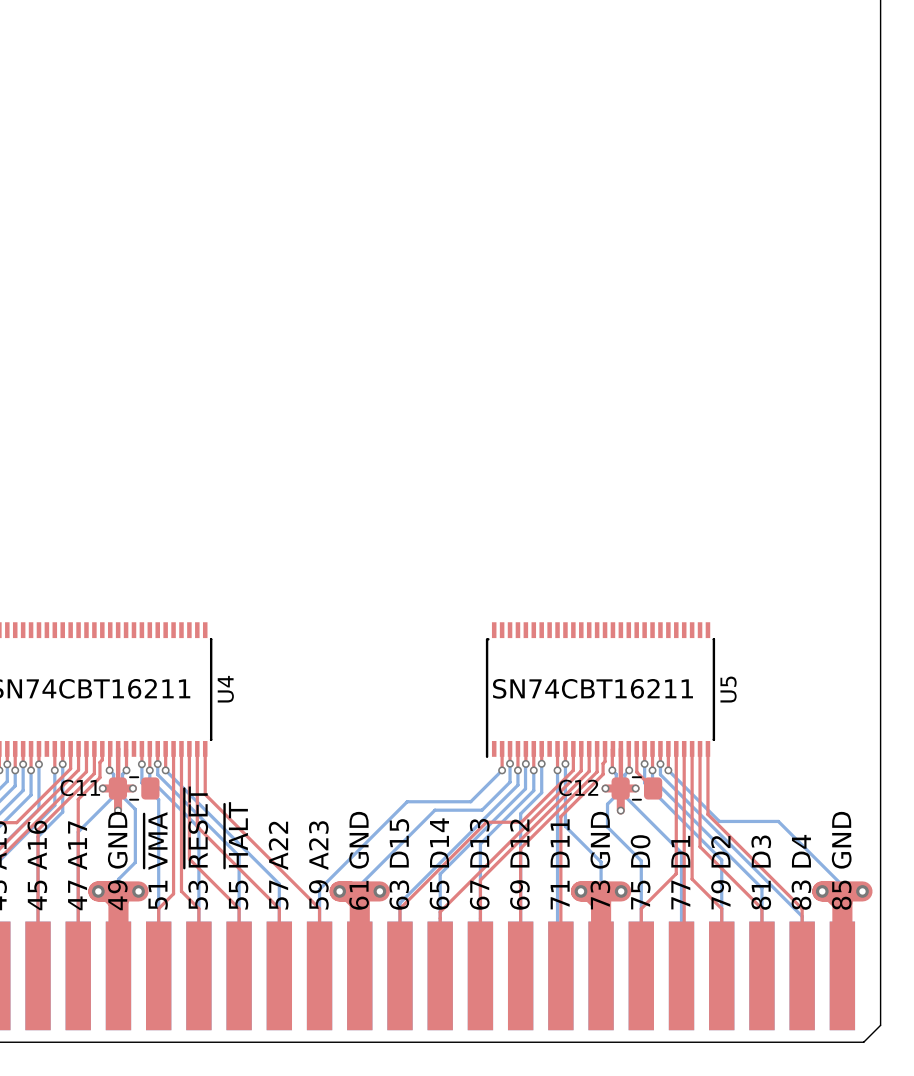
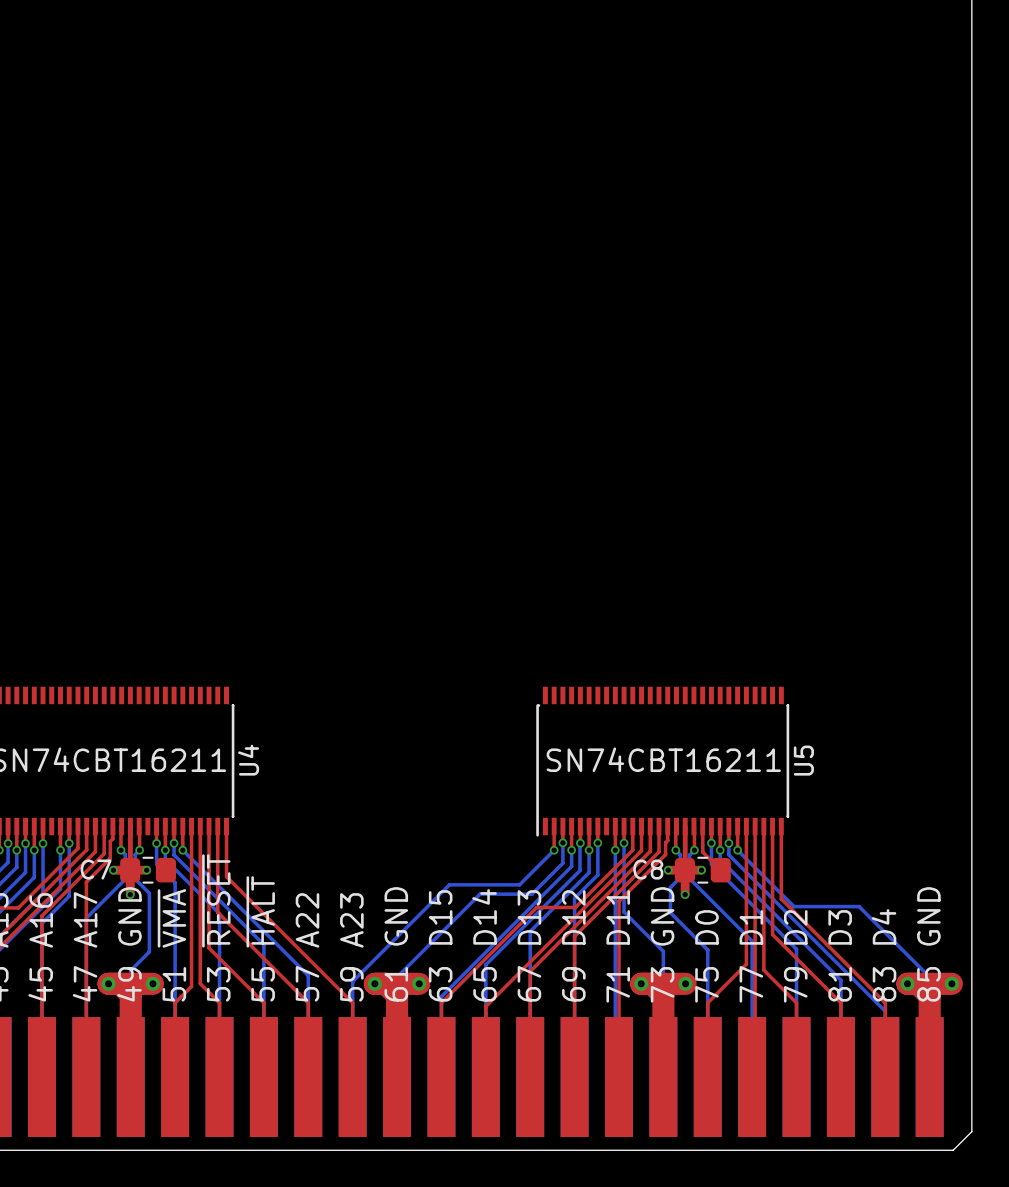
C11 name: C11 (80, 787) -> C7 (96, 869)
C12 name: C12 (578, 787) -> C8 (648, 869)

